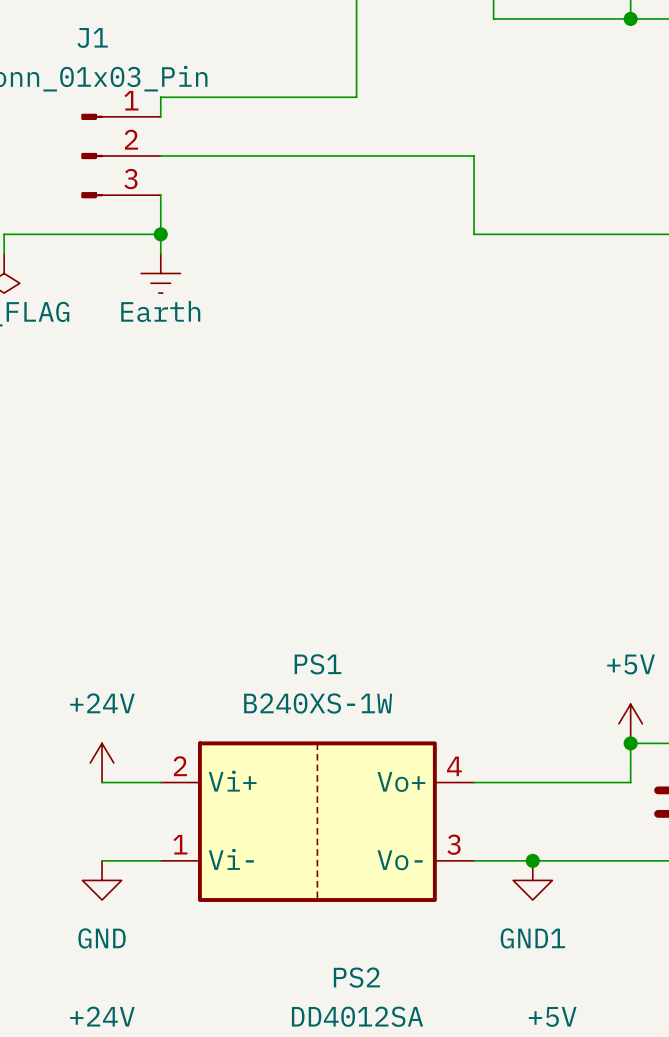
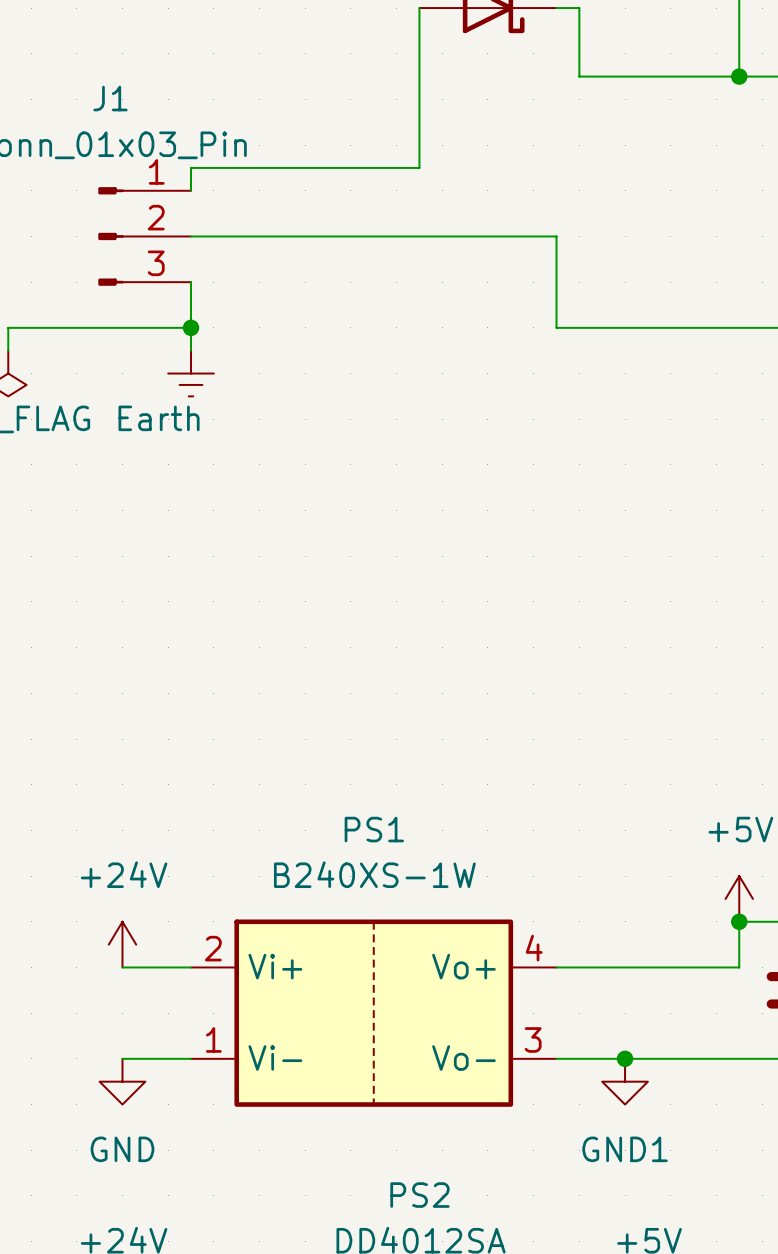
power symbol text position: Earth (160, 311) -> Earth (159, 418)

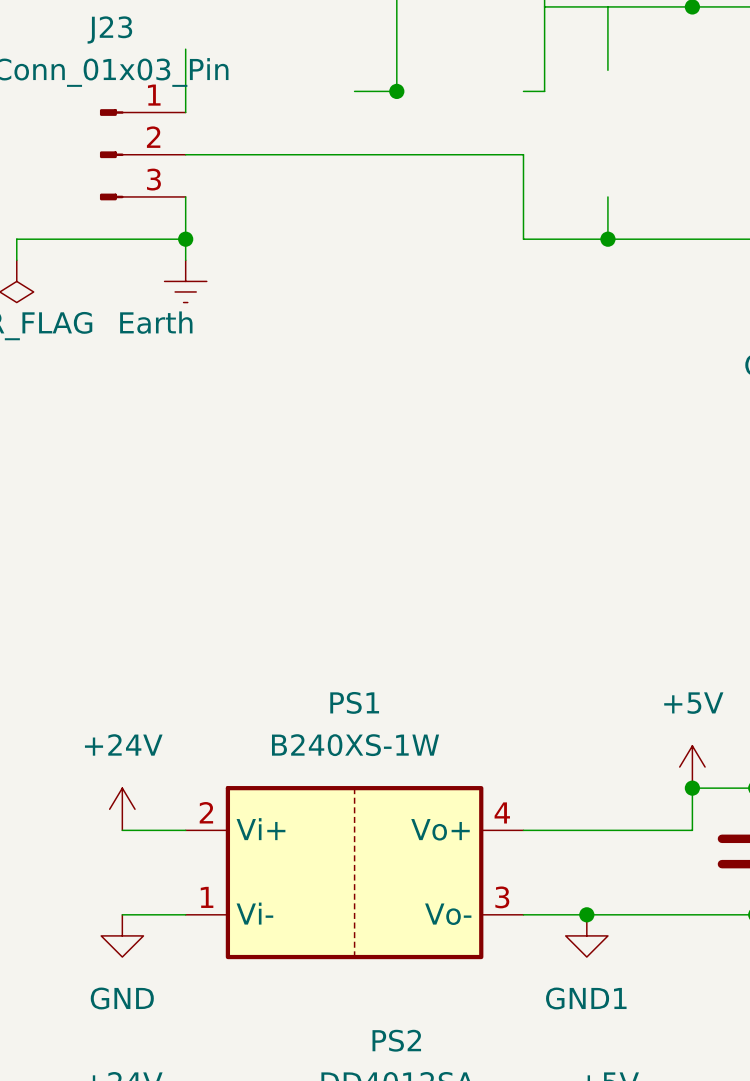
wire: none -> (544, 6) (544, 91) (523, 91)
wire: none -> (607, 6) (607, 70)
J1 name: J1 (110, 98) -> J23 (109, 29)
wire: (191, 167) (373, 167) -> (185, 91) (185, 49)
junction: none -> (396, 91)
wire: none -> (607, 196) (607, 239)
junction: none -> (607, 239)

